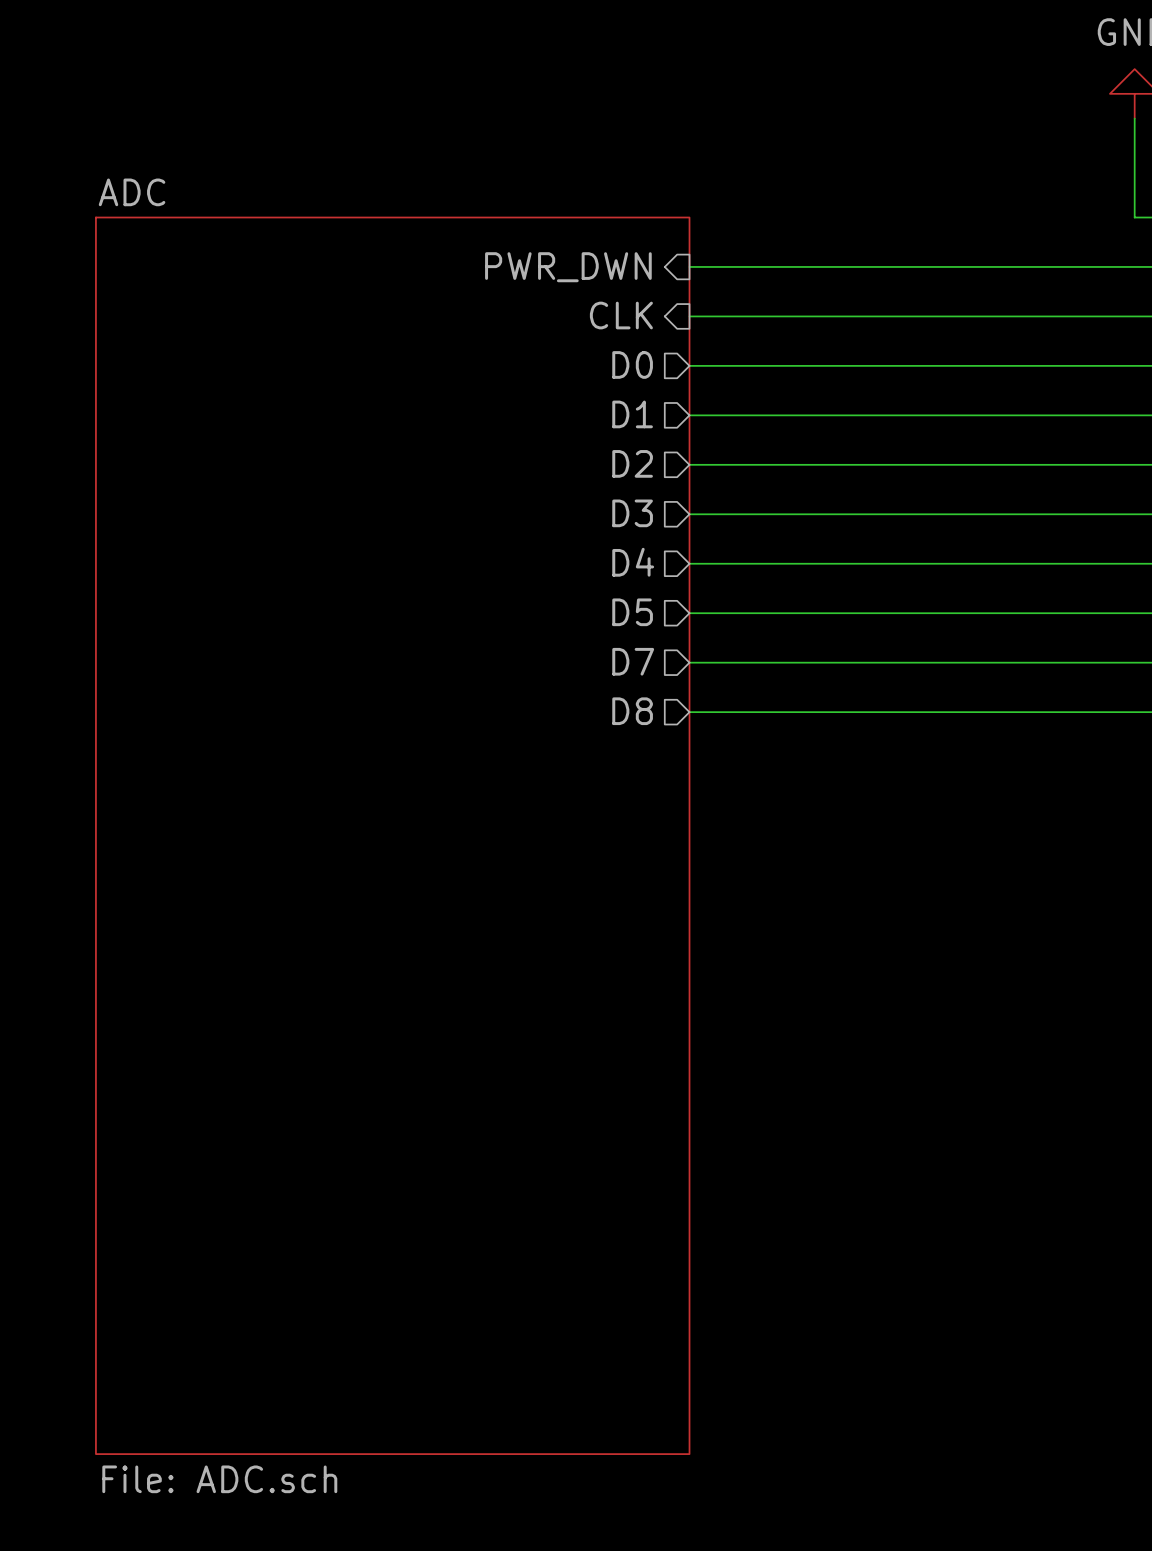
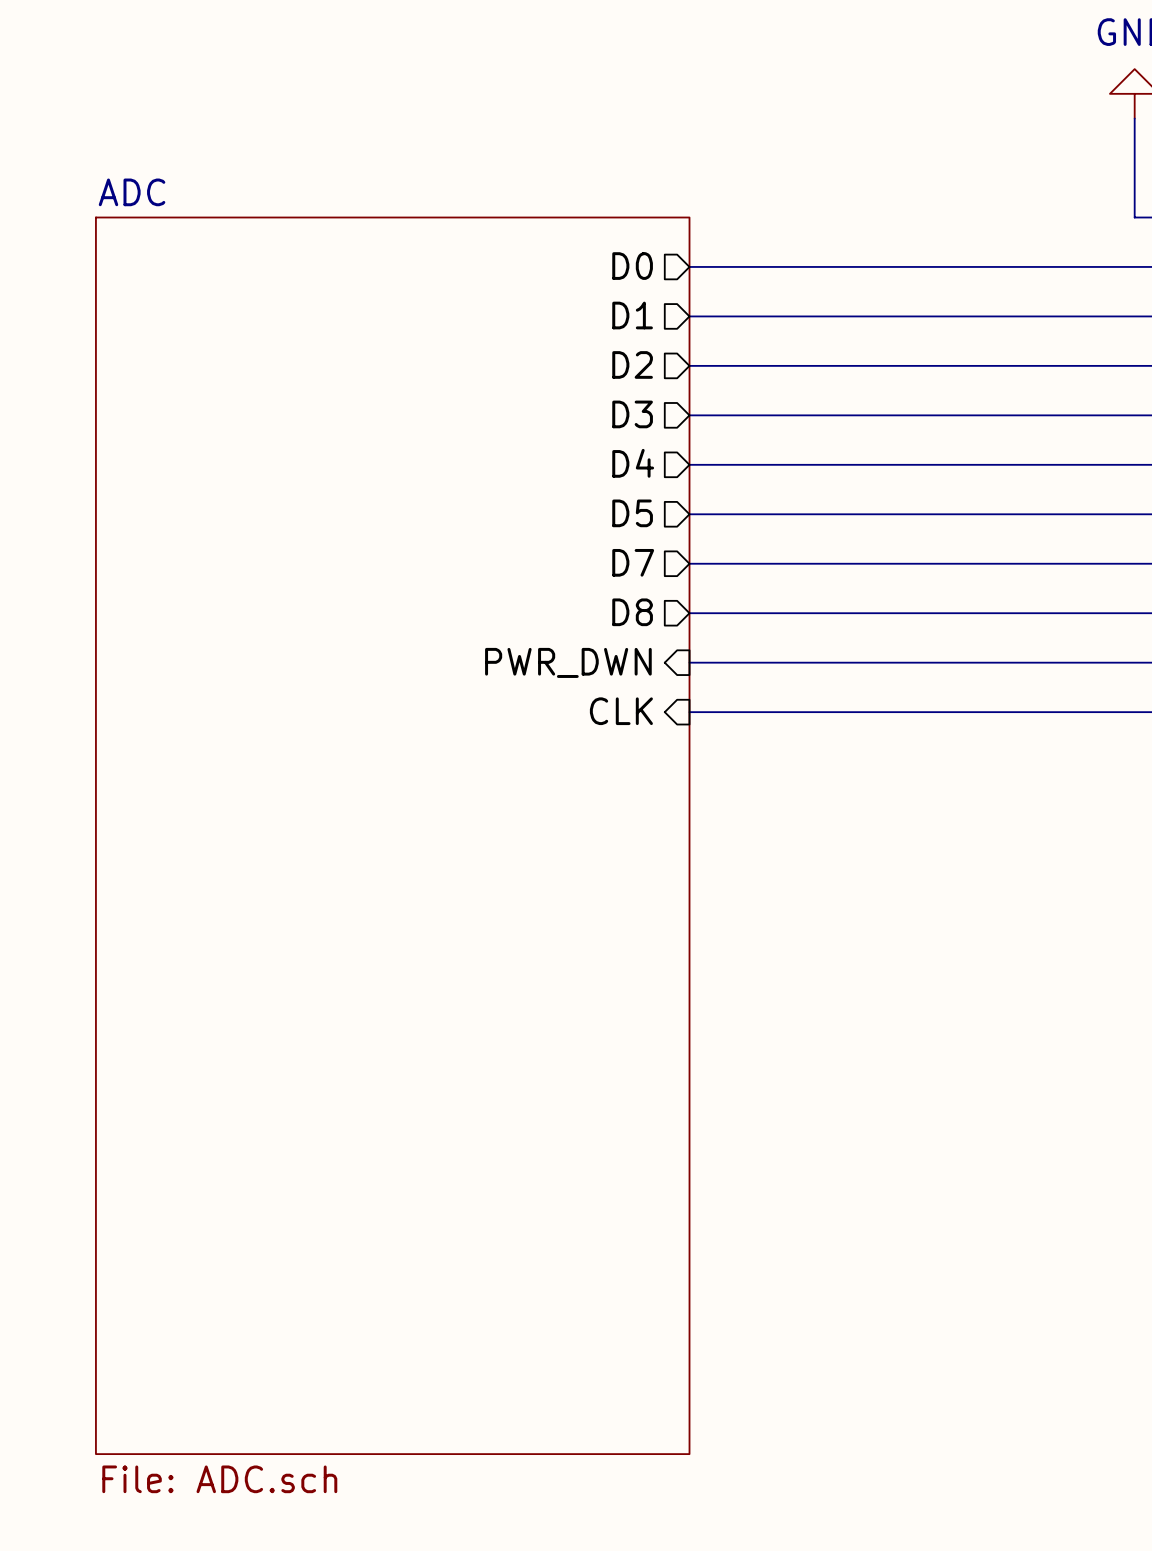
sheet pin shape: input (568, 267) -> output (632, 266)
sheet pin: PWR_DWN (568, 267) -> D0 (632, 266)
sheet pin shape: input (621, 315) -> output (632, 315)
sheet pin: CLK (621, 315) -> D1 (632, 315)
sheet pin: D0 (632, 364) -> D2 (632, 364)
sheet pin: D1 (632, 414) -> D3 (632, 414)
sheet pin: D2 (632, 463) -> D4 (633, 463)
sheet pin: D3 (632, 513) -> D5 (632, 513)
sheet pin: D4 (633, 562) -> D7 (633, 562)
sheet pin: D5 (632, 612) -> D8 (632, 612)
sheet pin shape: output (633, 661) -> input (568, 662)
sheet pin: D7 (633, 661) -> PWR_DWN (568, 662)
sheet pin shape: output (632, 711) -> input (621, 711)
sheet pin: D8 (632, 711) -> CLK (621, 711)

